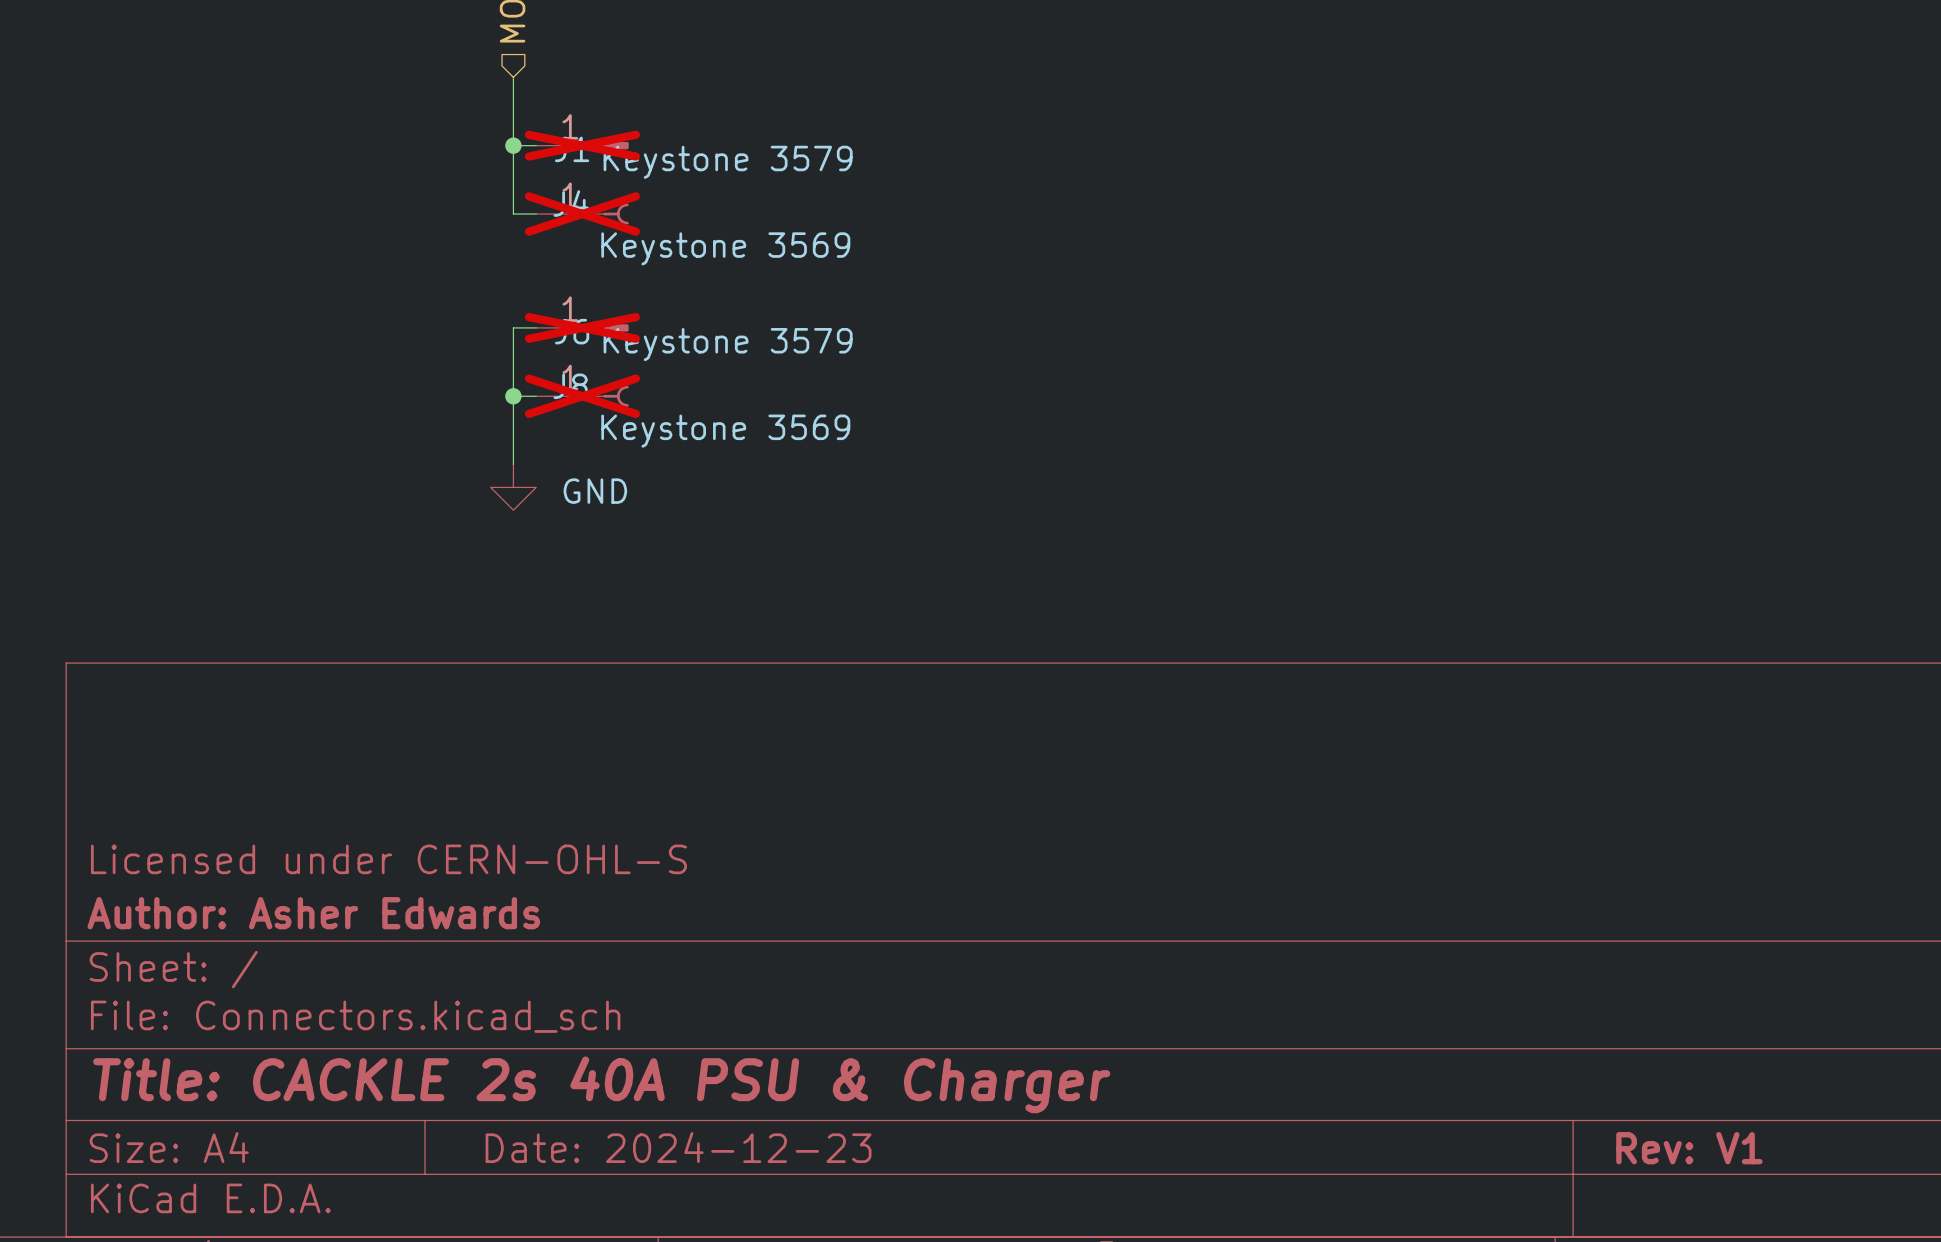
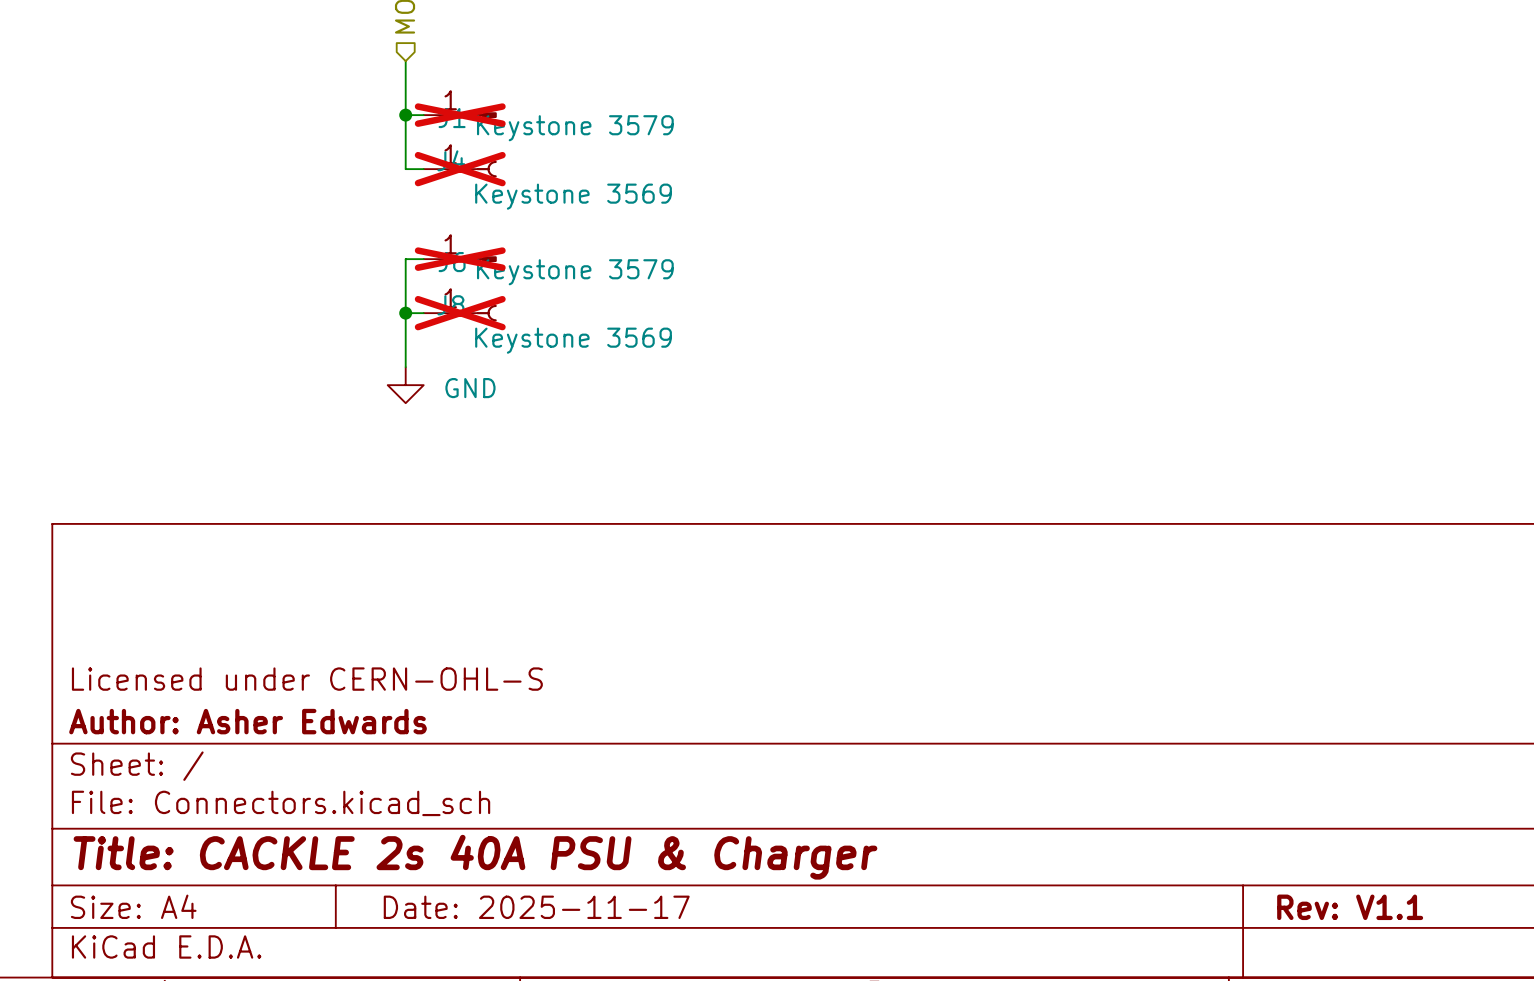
title block: Date: 2024-12-23 (678, 1147) -> Date: 2025-11-17 (536, 907)
title block: Rev: V1 (1689, 1148) -> Rev: V1.1 (1350, 907)

